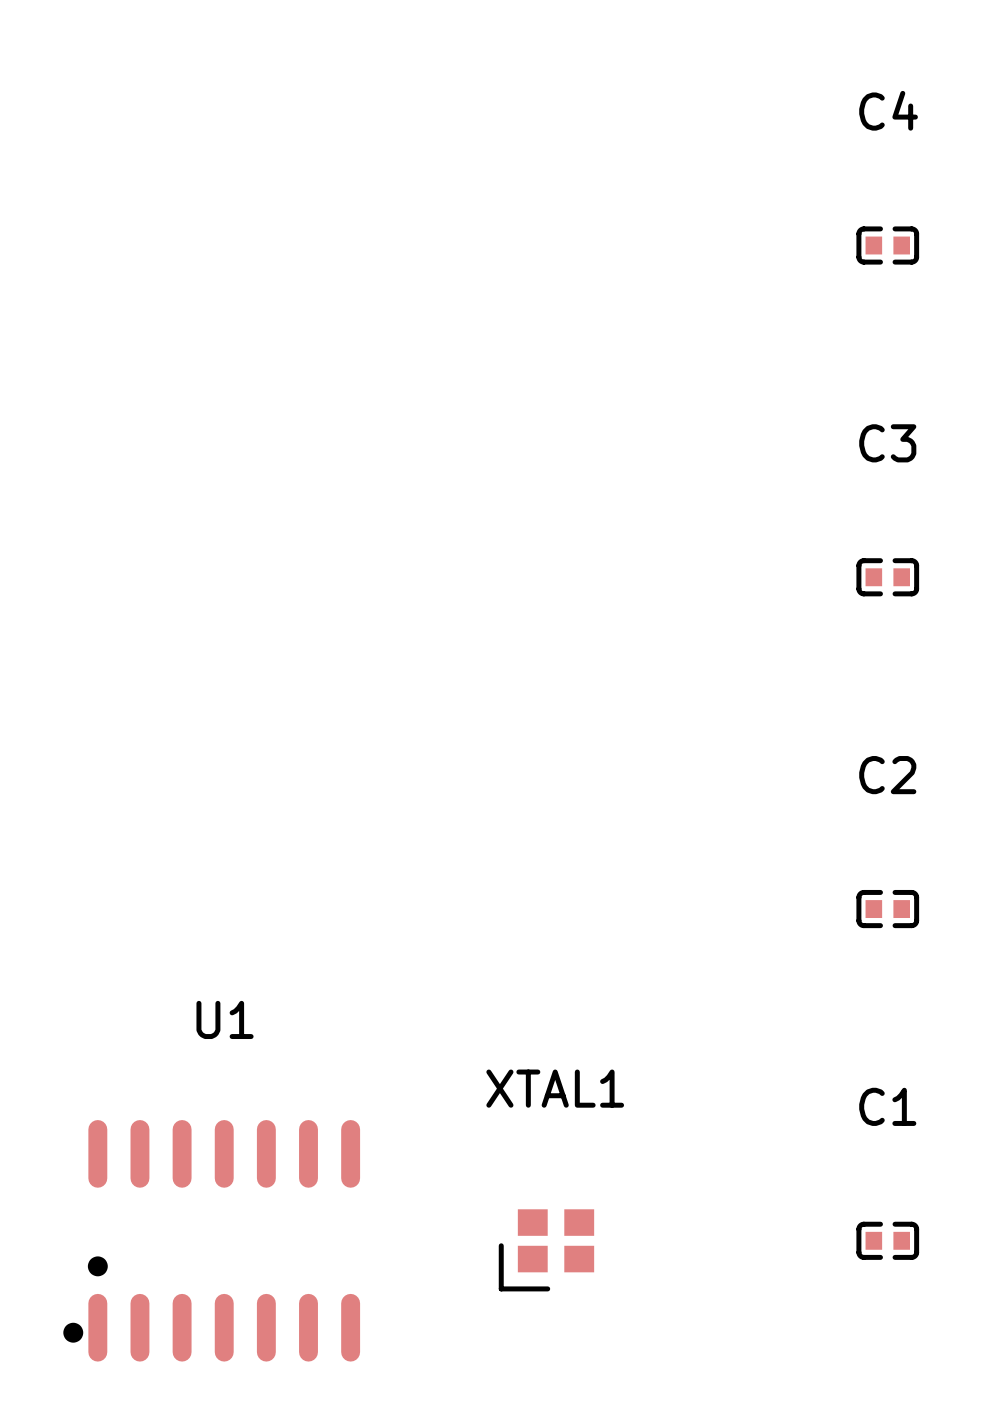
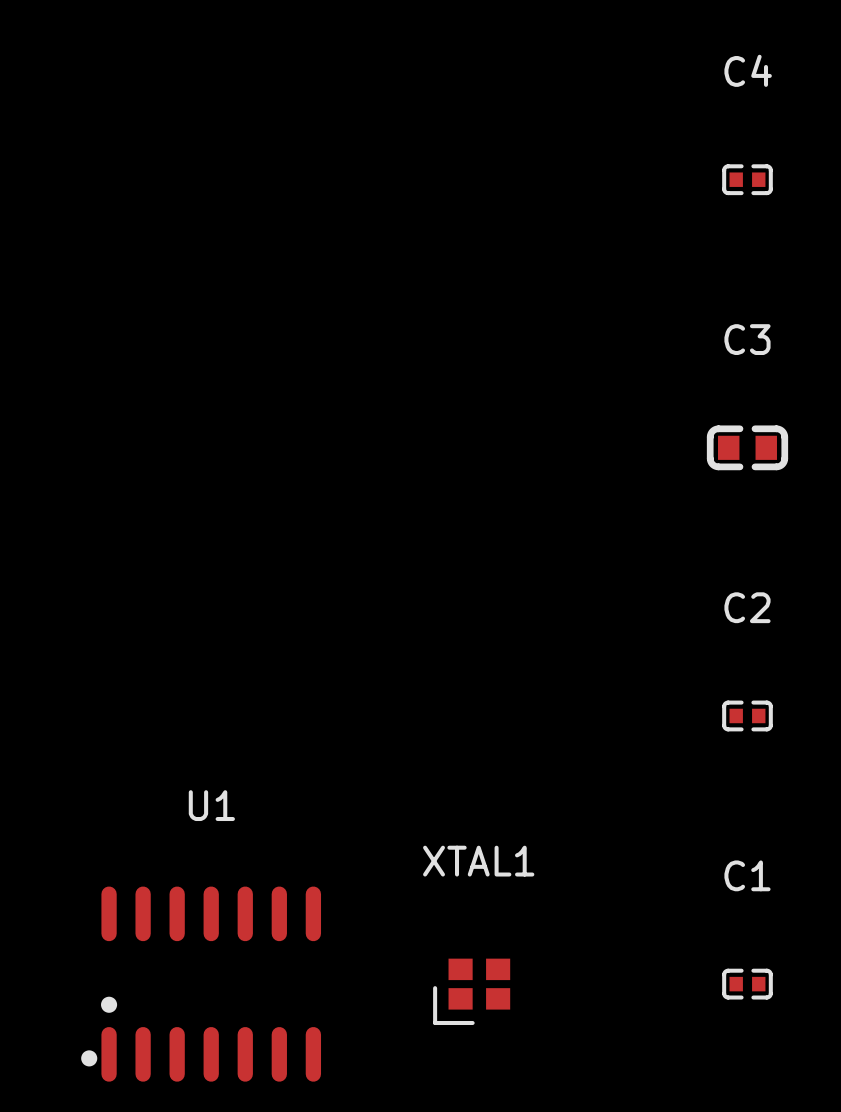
C3 footprint: [856, 558, 920, 597] -> [706, 425, 789, 471]

